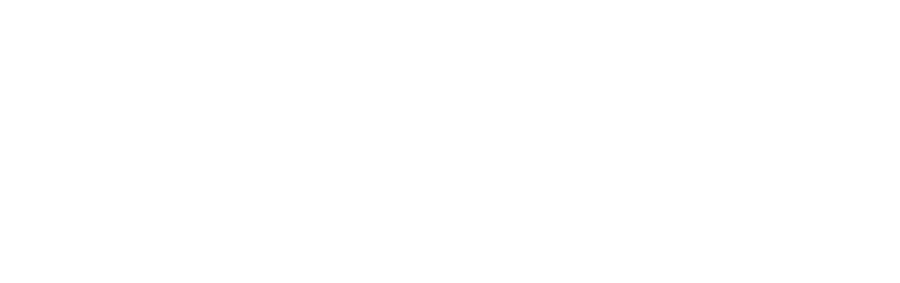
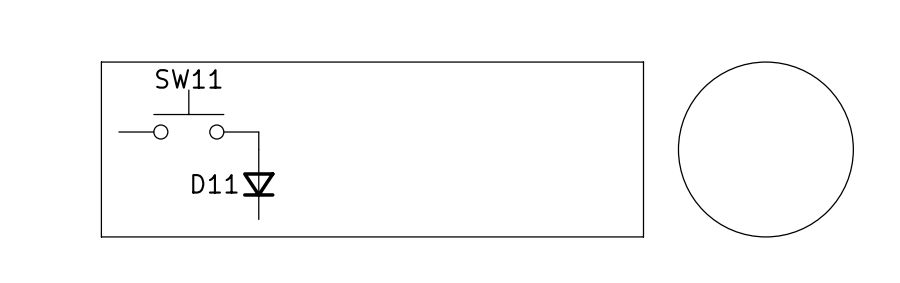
line: none -> (101, 62) (643, 62) (643, 236) (101, 236) (101, 62)
drawing: none -> [678, 62, 854, 237]
SW11: none -> (188, 114)
wire: none -> (258, 132) (258, 149)
D11: none -> (258, 184)

